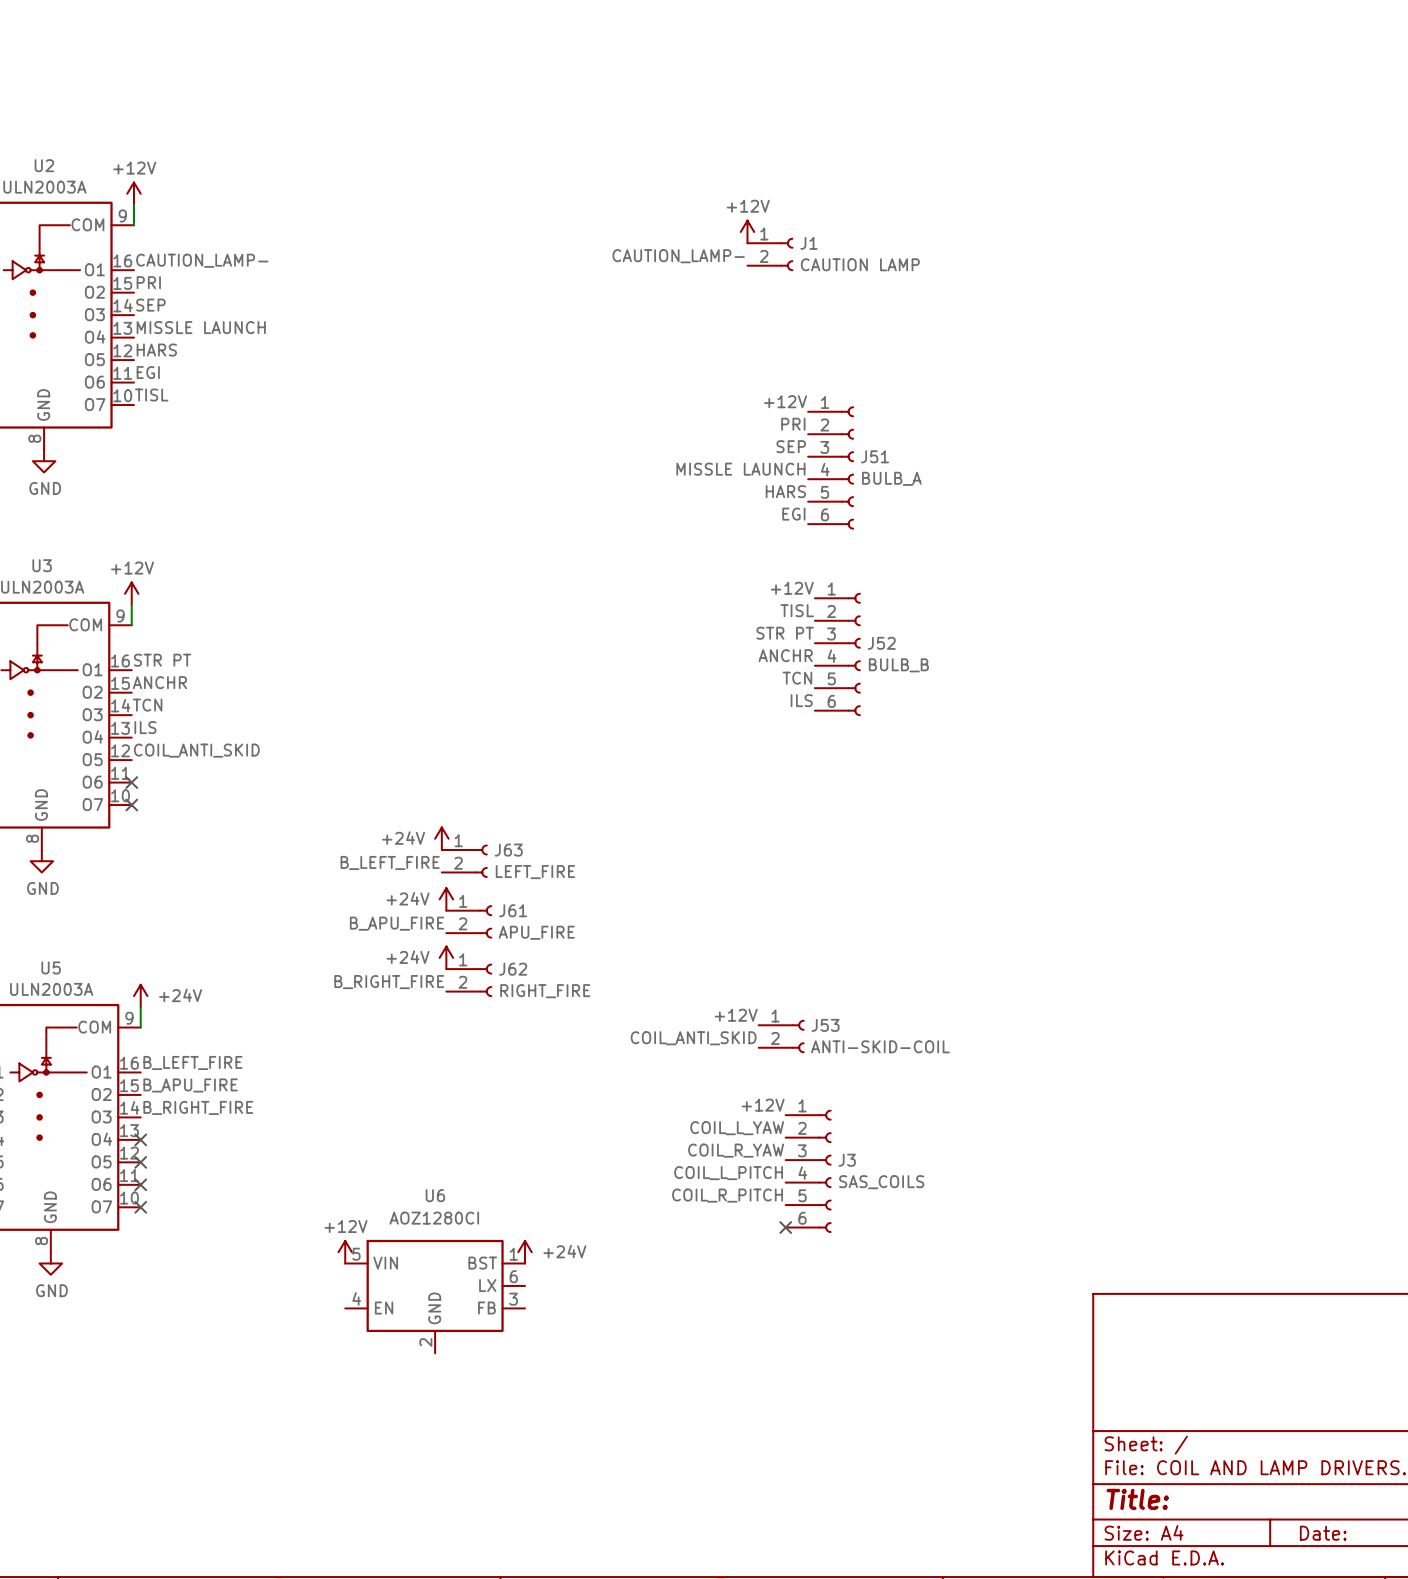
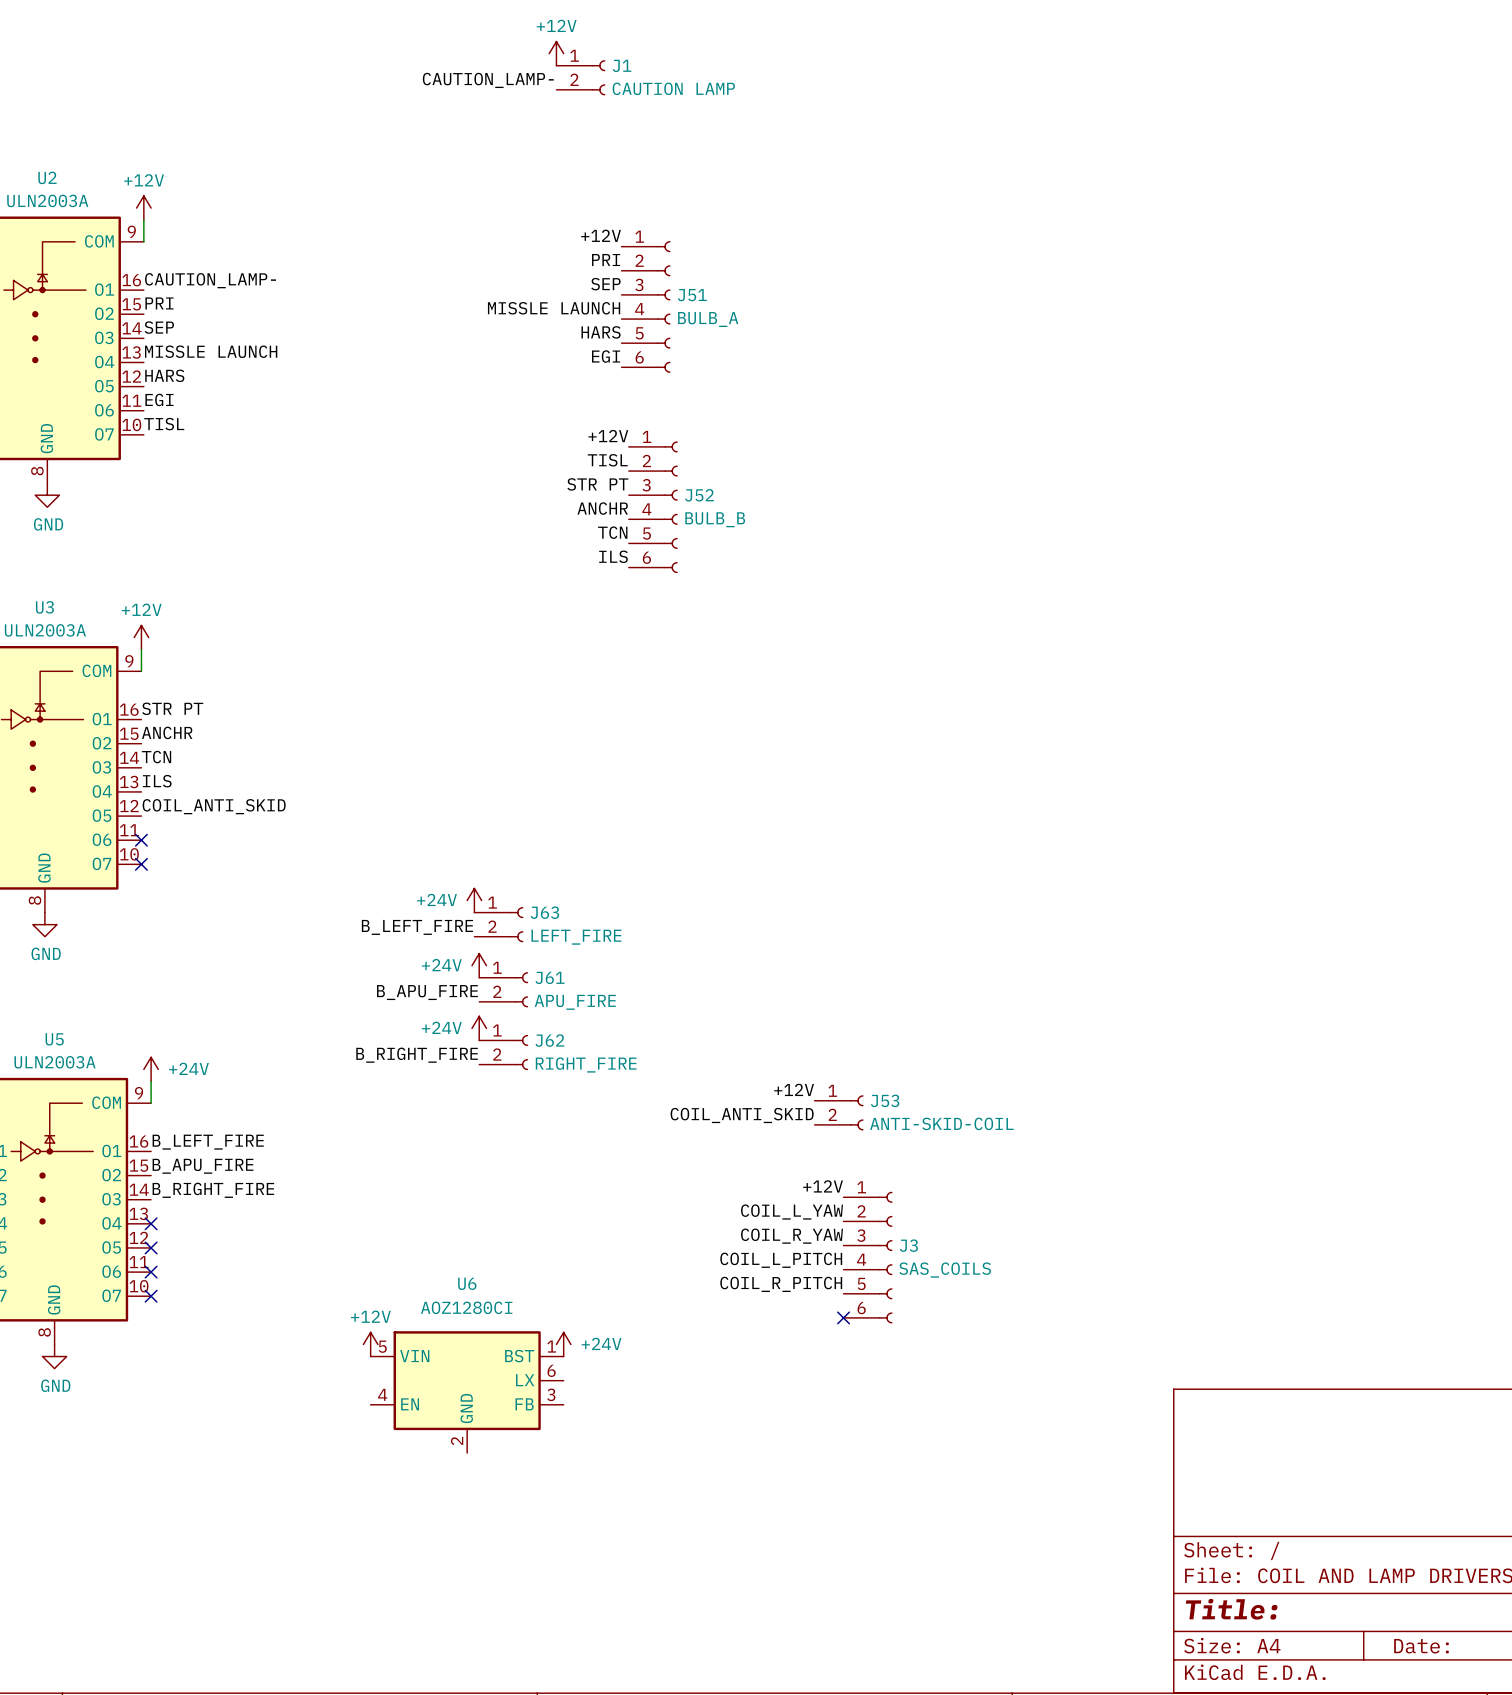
power symbol: none -> +12V (556, 53)
label: none -> CAUTION_LAMP- (488, 80)
label: none -> +12V (601, 235)
power symbol: +12V (747, 231) -> none
label: none -> PRI (606, 260)
J1 position: (770, 254) -> (580, 77)
label: CAUTION_LAMP- (678, 256) -> none
label: none -> SEP (605, 284)
label: none -> MISSLE LAUNCH (554, 308)
label: none -> HARS (601, 332)
label: none -> EGI (606, 356)
label: +12V (785, 401) -> none
label: none -> +12V (608, 436)
label: PRI (793, 424) -> none
label: none -> TISL (607, 460)
label: SEP (791, 446) -> none
label: none -> STR PT (597, 484)
J51 position: (830, 467) -> (646, 306)
label: MISSLE LAUNCH (740, 469) -> none
label: none -> ANCHR (602, 508)
label: HARS (785, 491) -> none
label: none -> TCN (612, 532)
label: EGI (793, 514) -> none
label: none -> ILS (613, 556)
label: +12V (792, 588) -> none
label: TISL (797, 610) -> none
label: STR PT (785, 633) -> none
J52 position: (837, 654) -> (653, 507)
label: ANCHR (785, 655) -> none
label: TCN (797, 678) -> none
label: ILS (801, 700) -> none

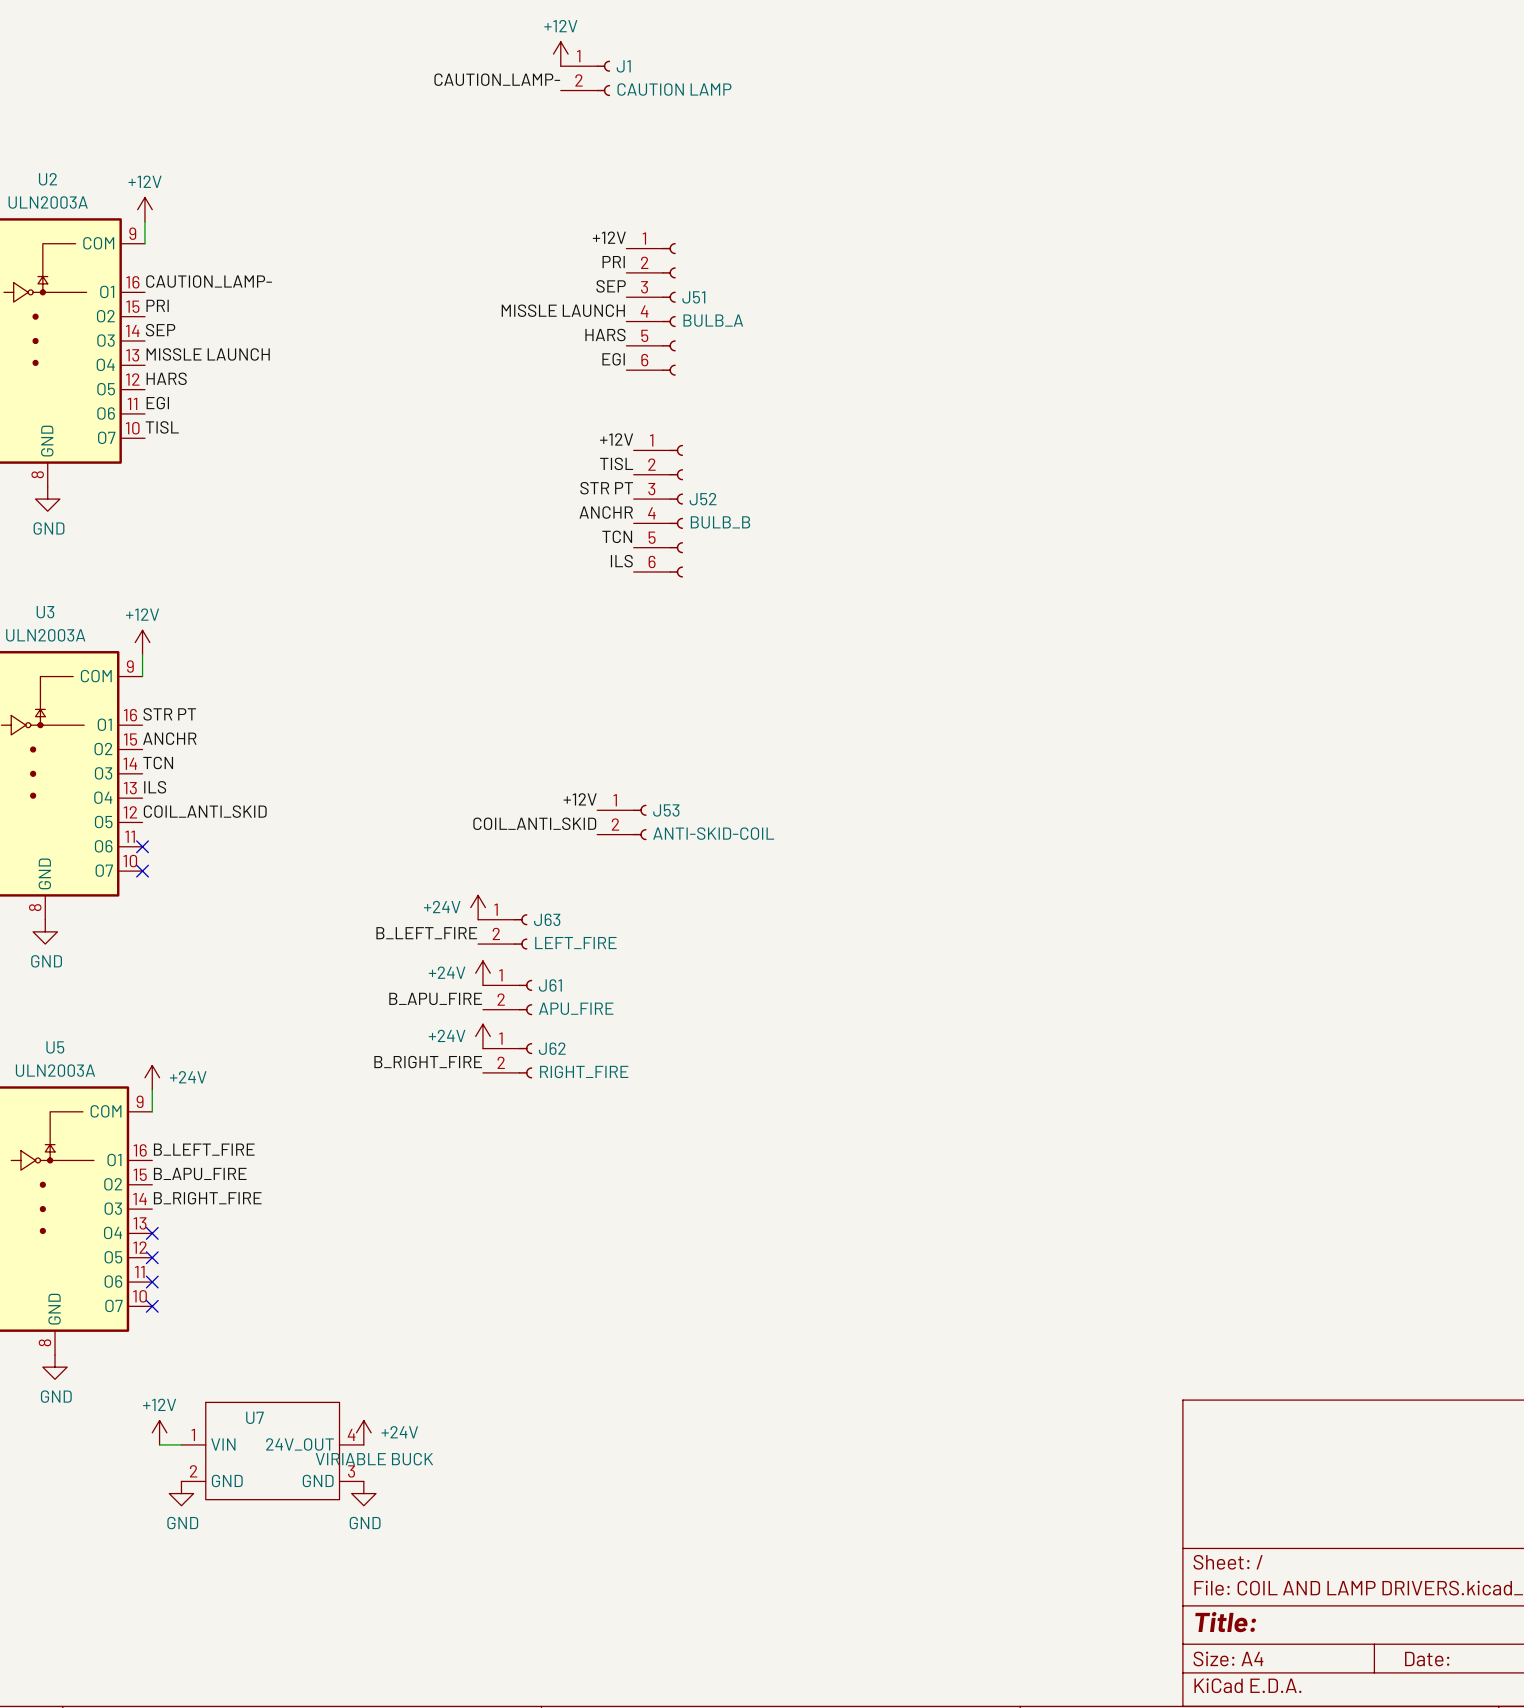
label: none -> +12V (580, 799)
label: none -> COIL_ANTI_SKID (534, 823)
label: +12V (794, 1089) -> none
J53 position: (839, 1112) -> (621, 822)
label: COIL_ANTI_SKID (742, 1115) -> none
label: +12V (823, 1186) -> none
label: COIL_L_YAW (792, 1212) -> none
label: COIL_R_YAW (792, 1236) -> none
J3: SAS_COILS (868, 1257) -> none
label: COIL_L_PITCH (781, 1260) -> none
label: COIL_R_PITCH (781, 1284) -> none
no-connect mark: (843, 1317) -> none
power symbol position: +12V (370, 1344) -> +12V (159, 1432)
power symbol position: +24V (563, 1344) -> +24V (363, 1432)
U6: AOZ1280CI (467, 1392) -> none
wire: none -> (159, 1444) (181, 1444)
U7: none -> VIRIABLE BUCK (272, 1451)
power symbol: none -> GND (181, 1493)
power symbol: none -> GND (363, 1493)

